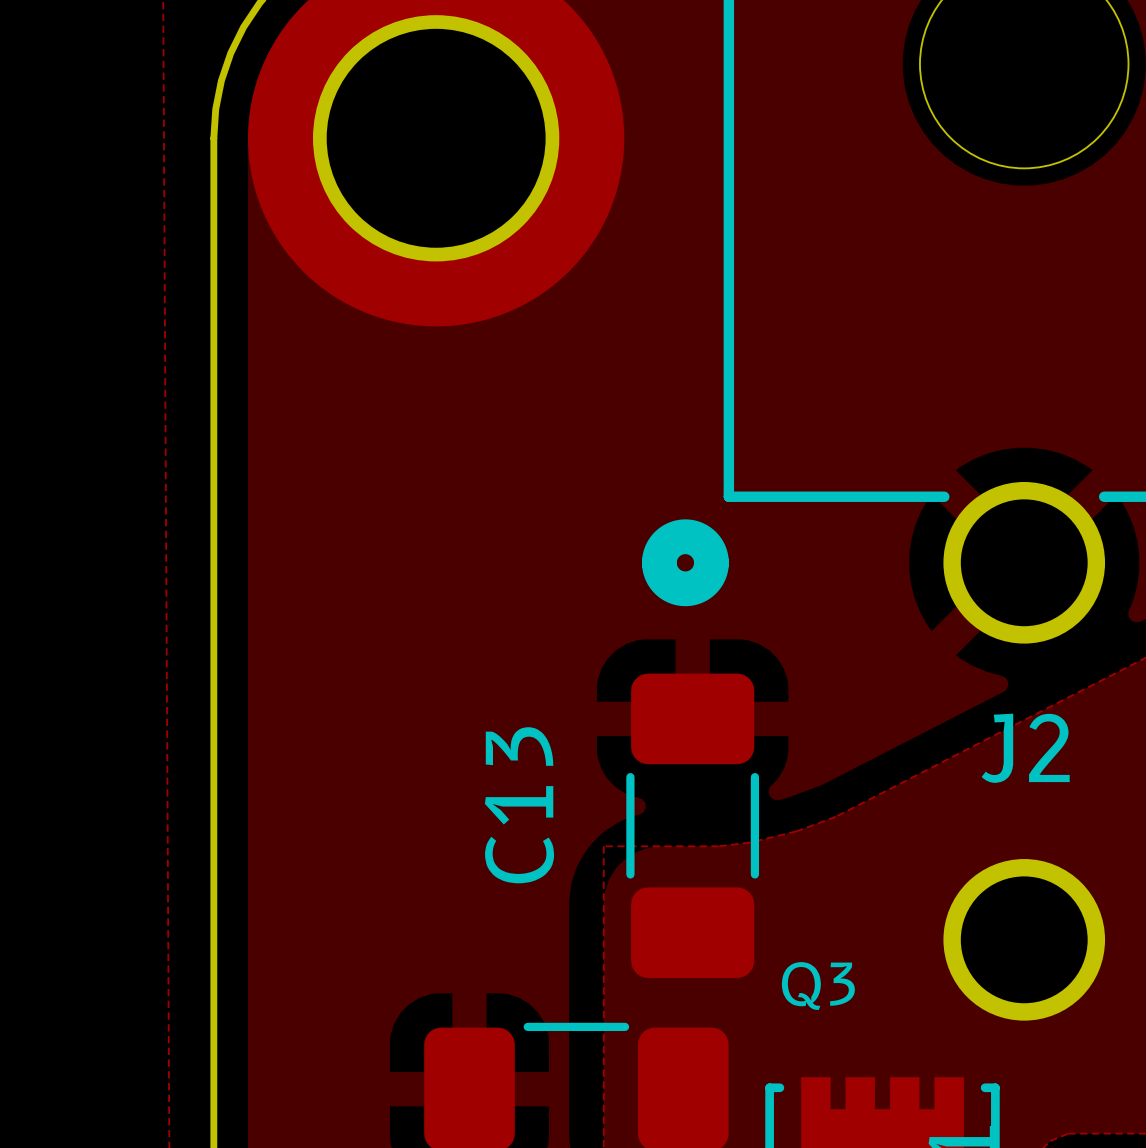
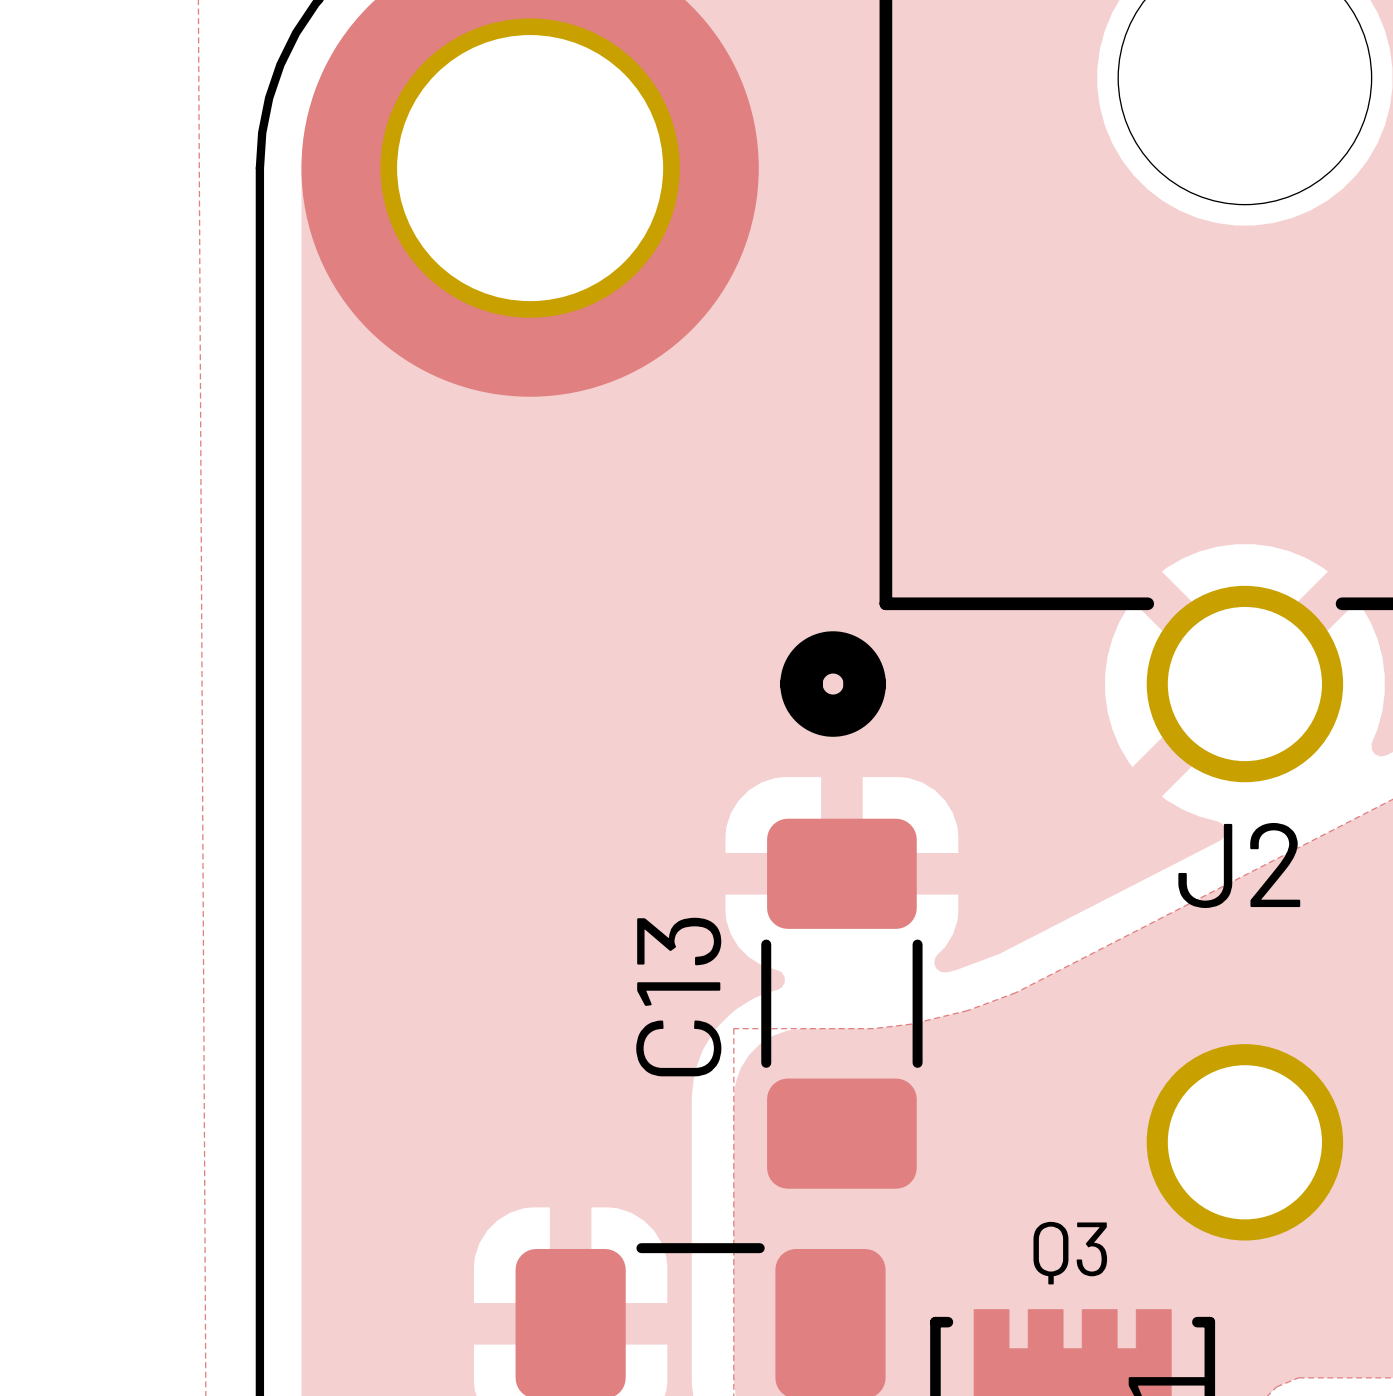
J2 name position: J2 (1025, 748) -> J2 (1239, 865)
C13 name position: C13 (519, 805) -> C13 (678, 997)
Q3 name position: Q3 (818, 986) -> Q3 (1070, 1253)

